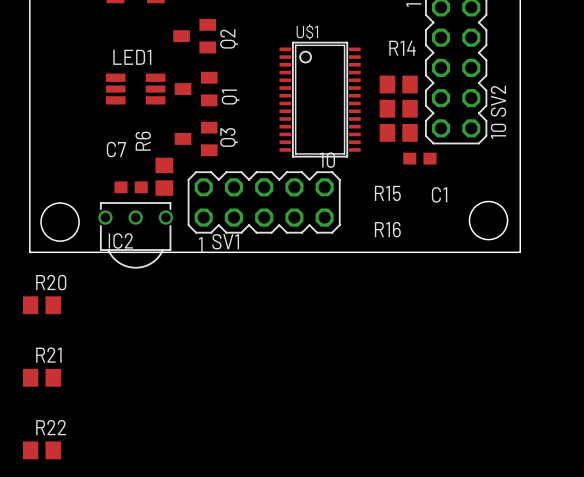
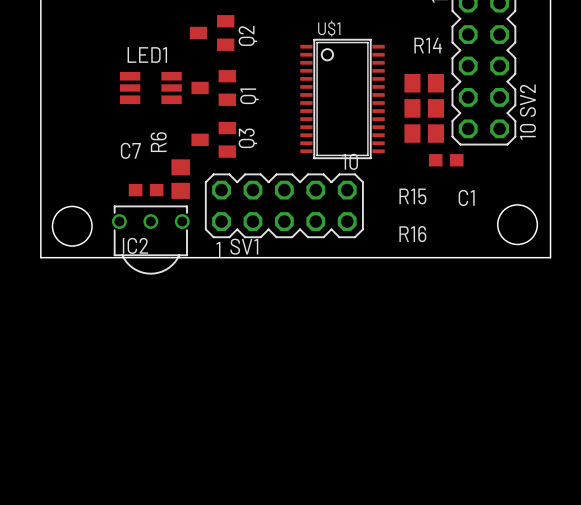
R20: (41, 305) -> none
R21: (41, 377) -> none
R22: (41, 450) -> none

